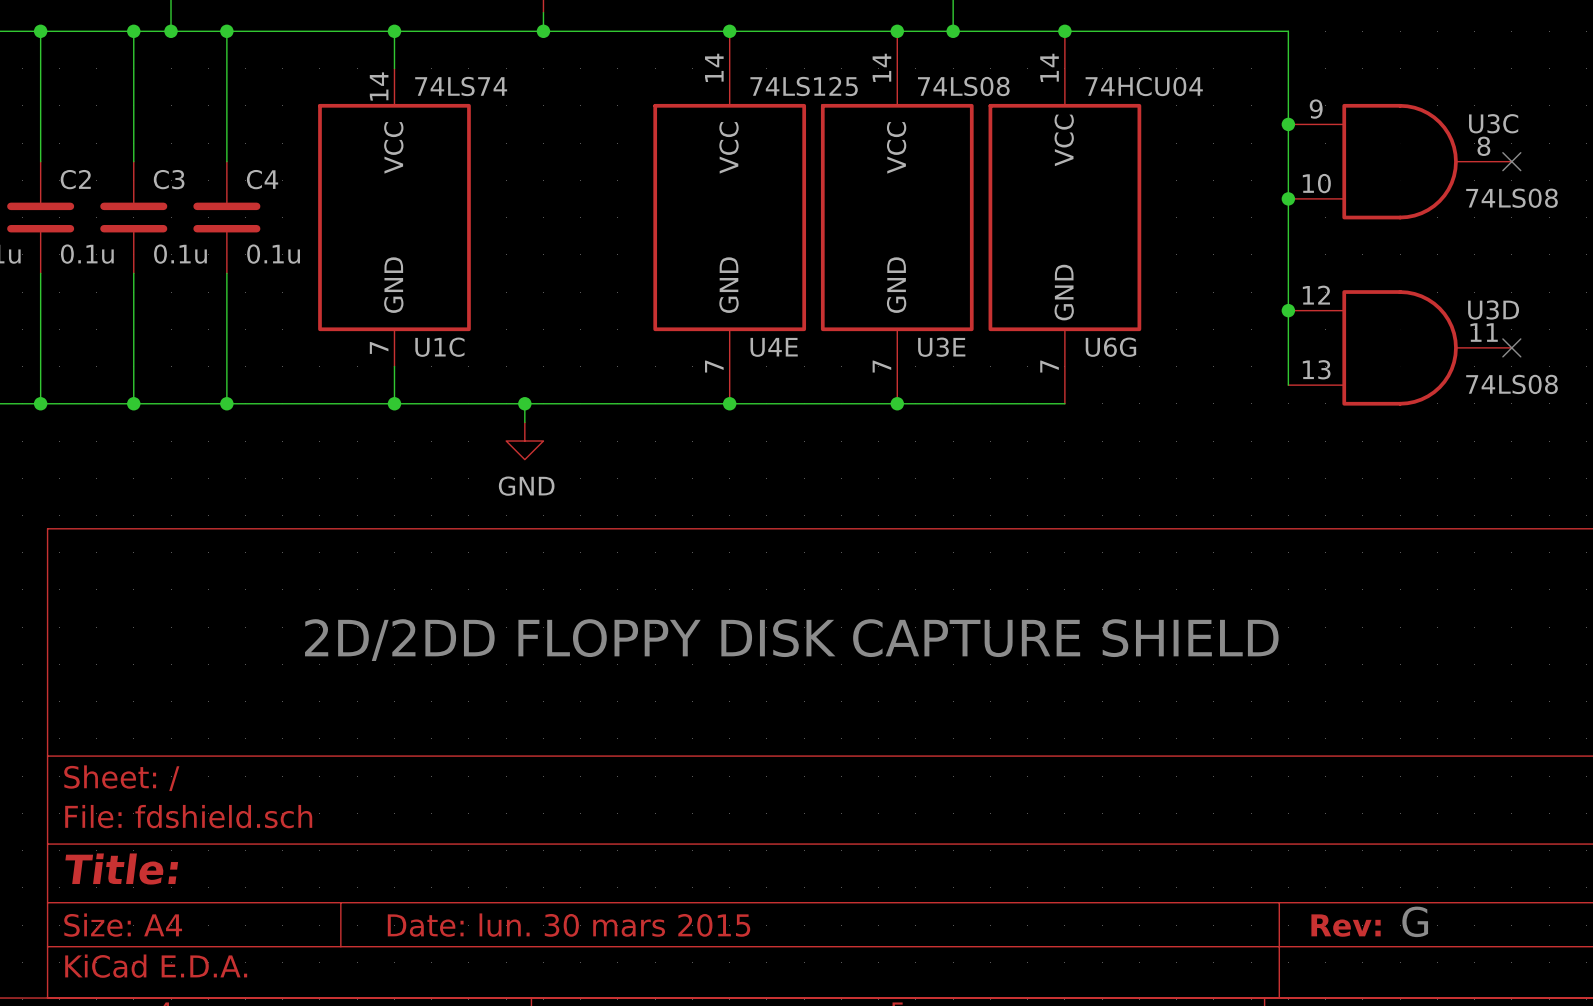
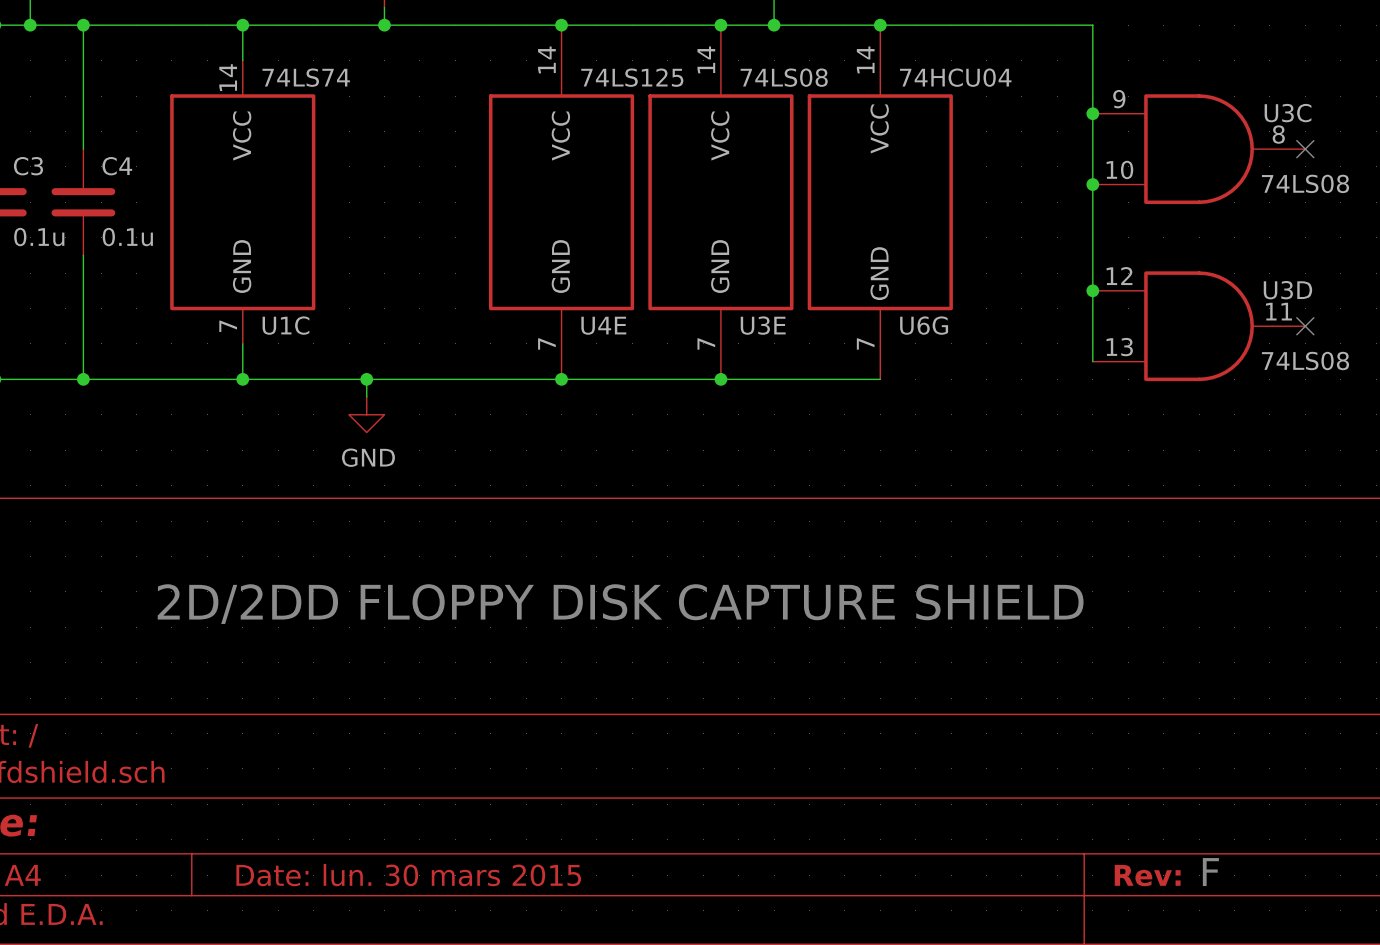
text: G (1415, 921) -> F (1210, 872)

